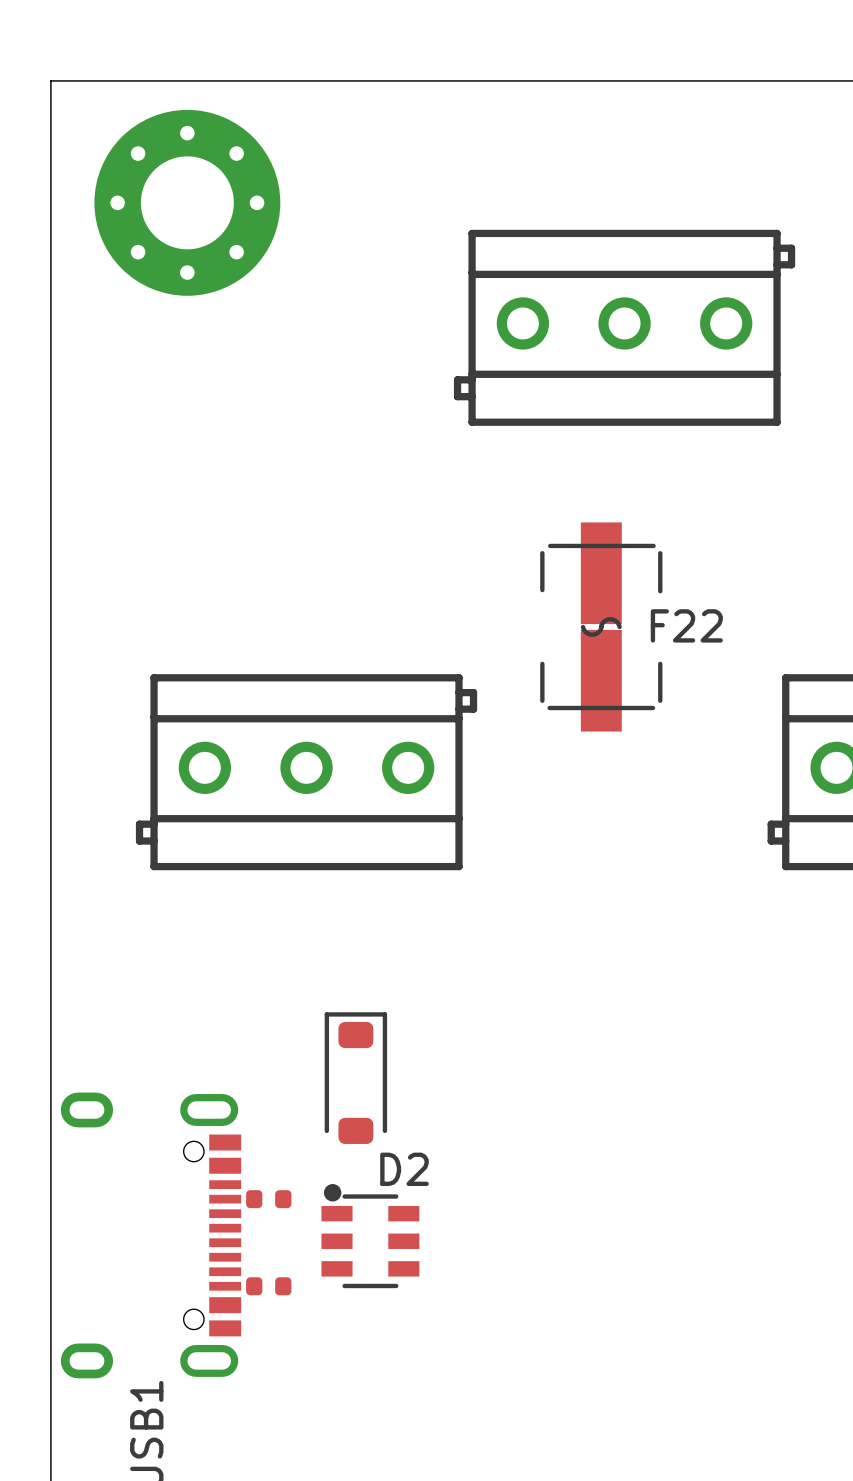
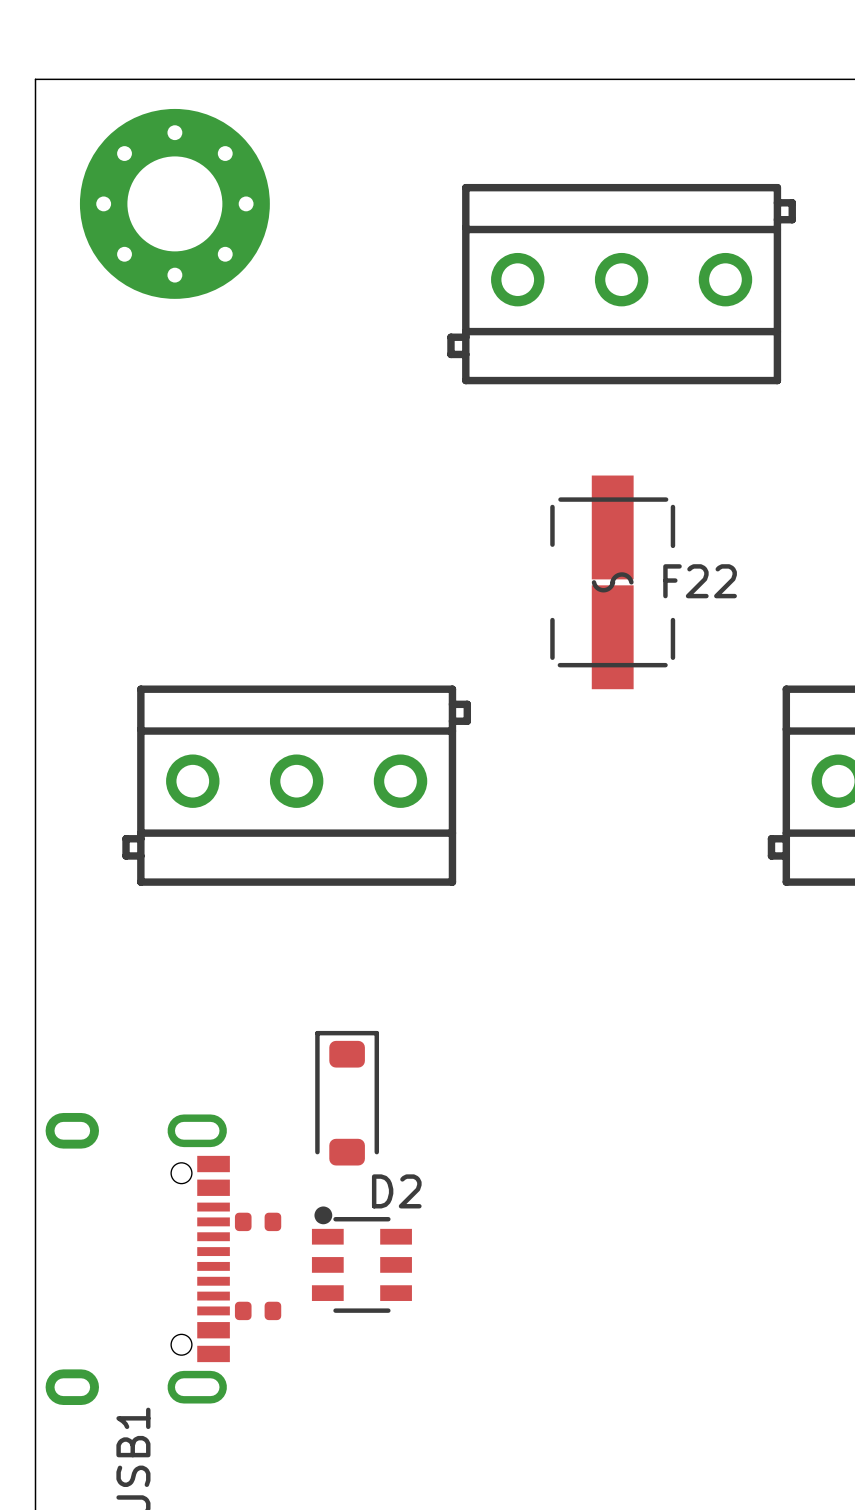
part position: (624, 327) -> (621, 284)
F22 position: (601, 626) -> (612, 582)

